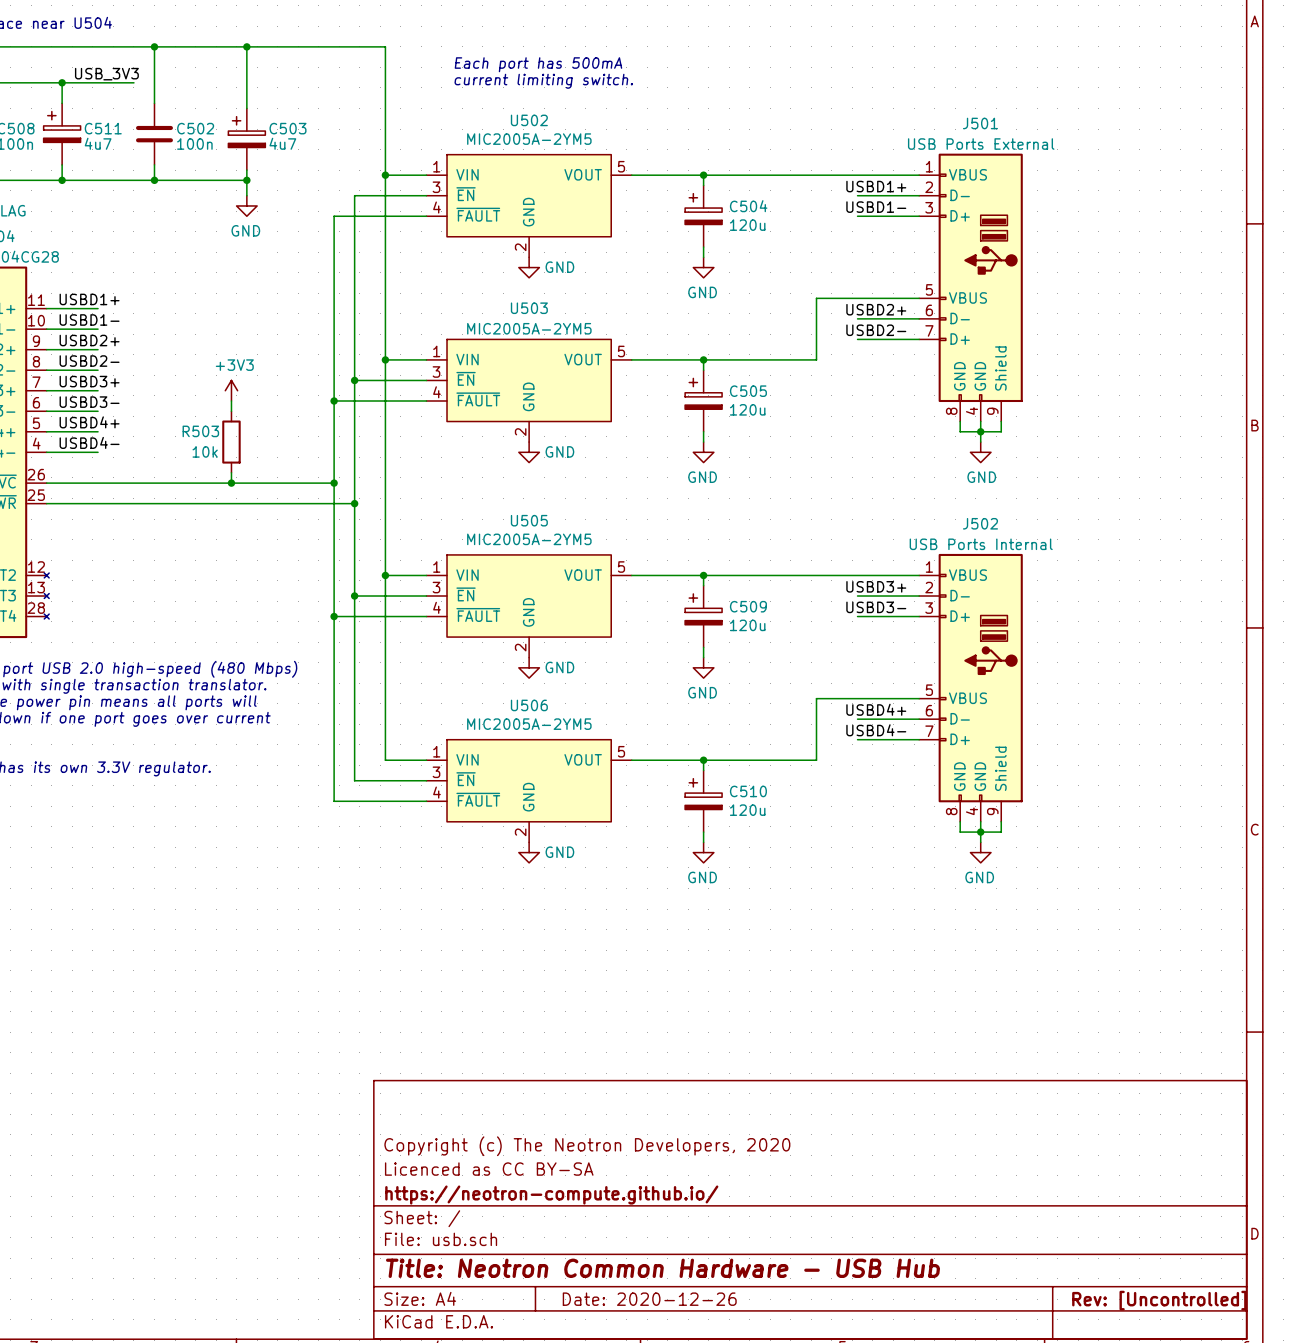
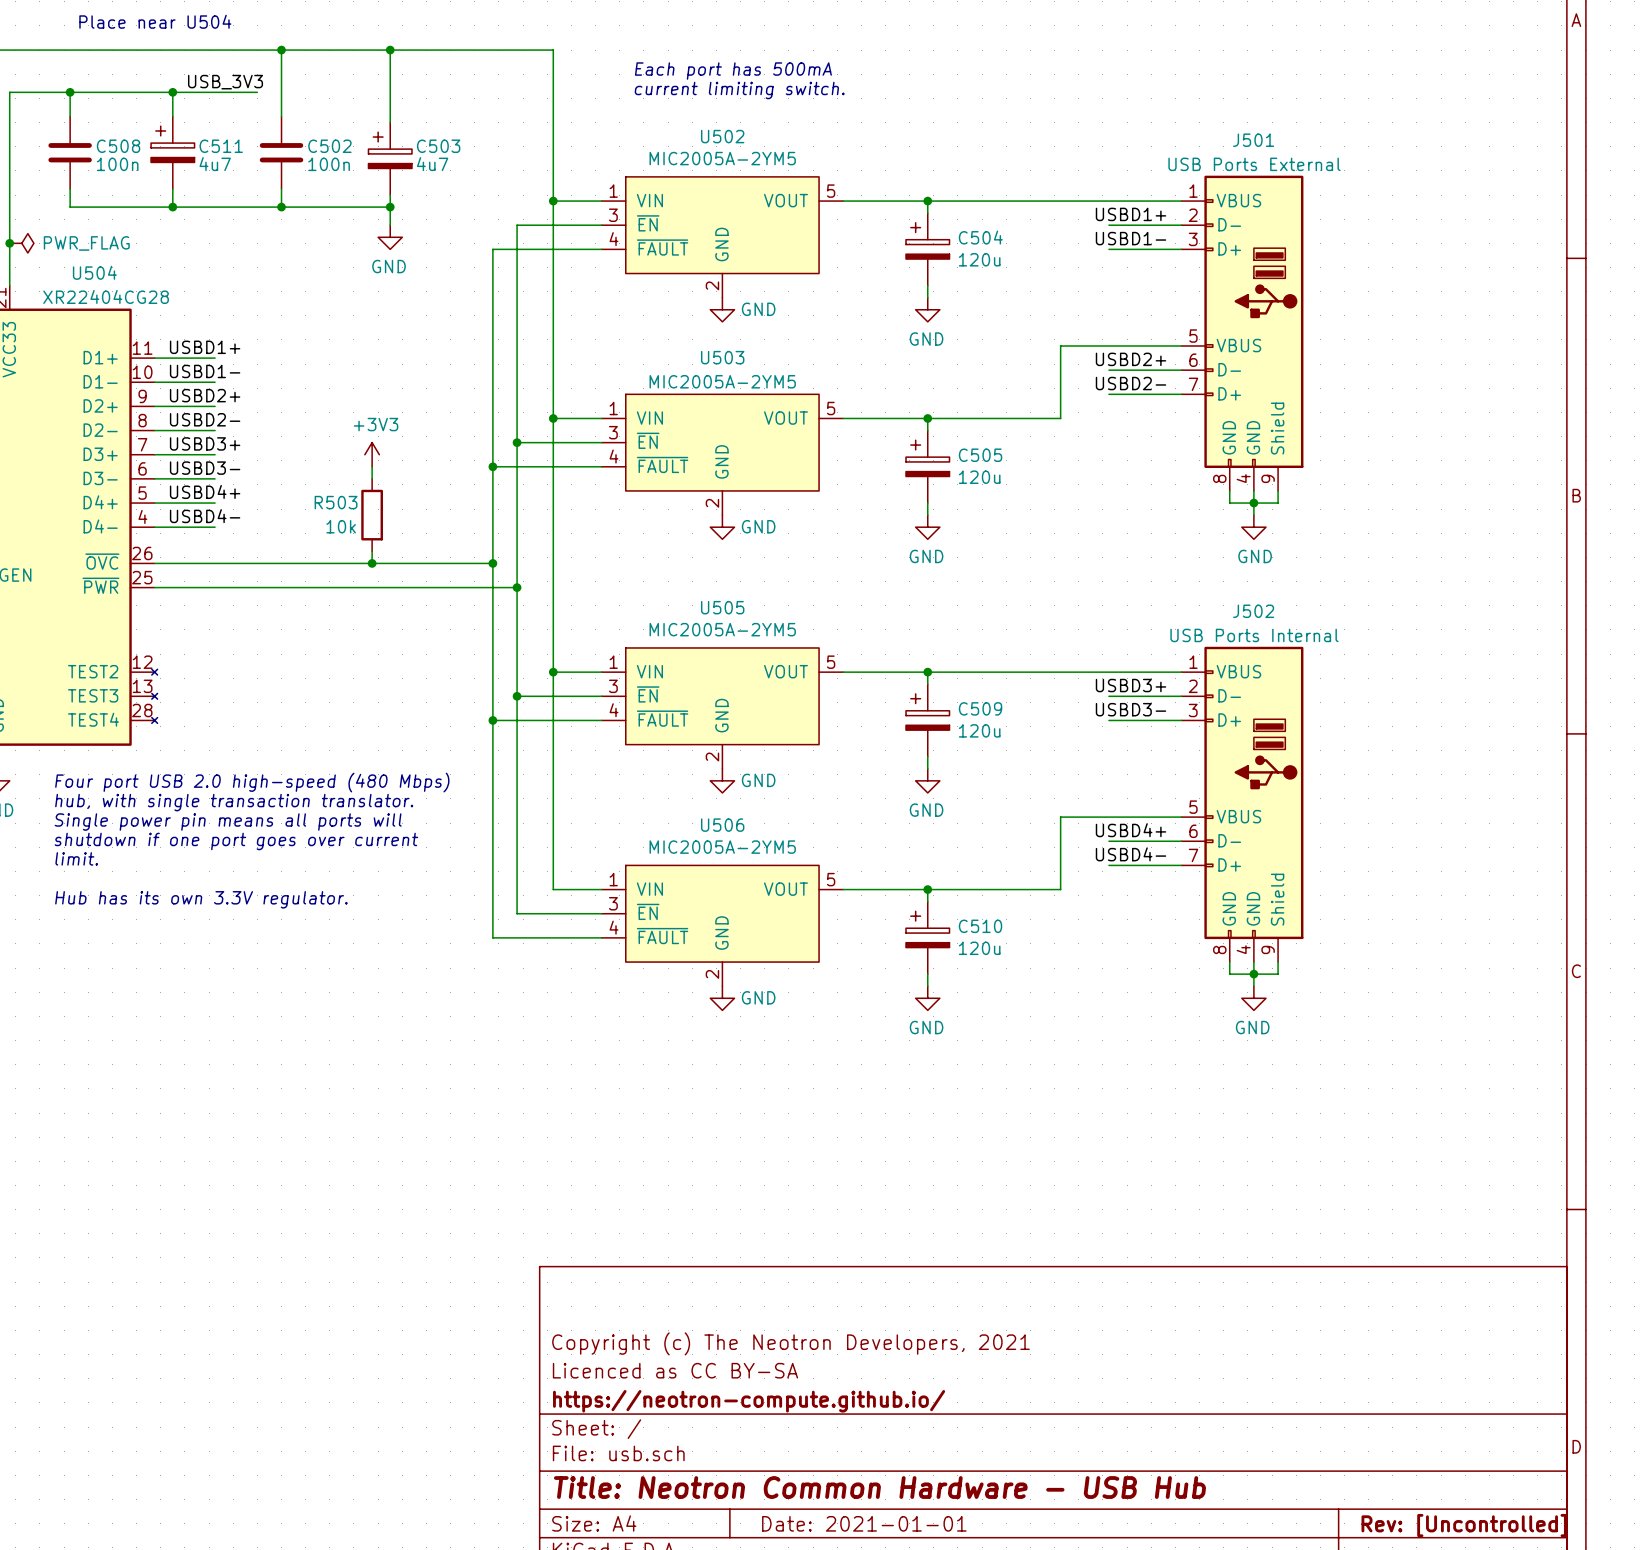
title block: Copyright (c) The Neotron Developers, 2020 (587, 1146) -> Copyright (c) The Neotron Developers, 2021 (790, 1343)
title block: Date: 2020-12-26 (649, 1299) -> Date: 2021-01-01 (864, 1523)

